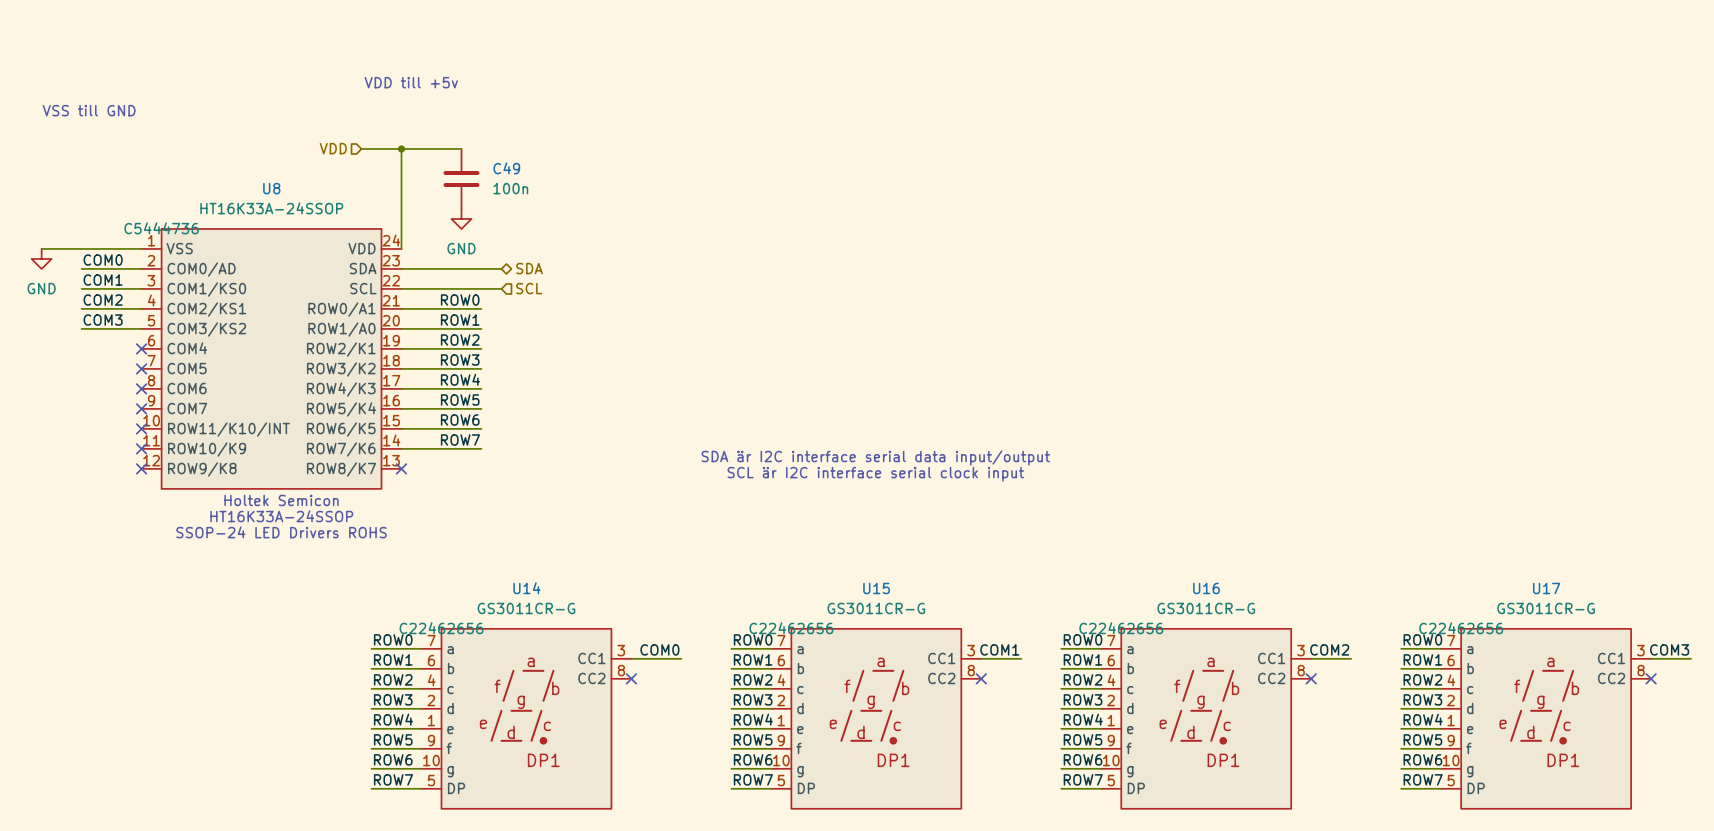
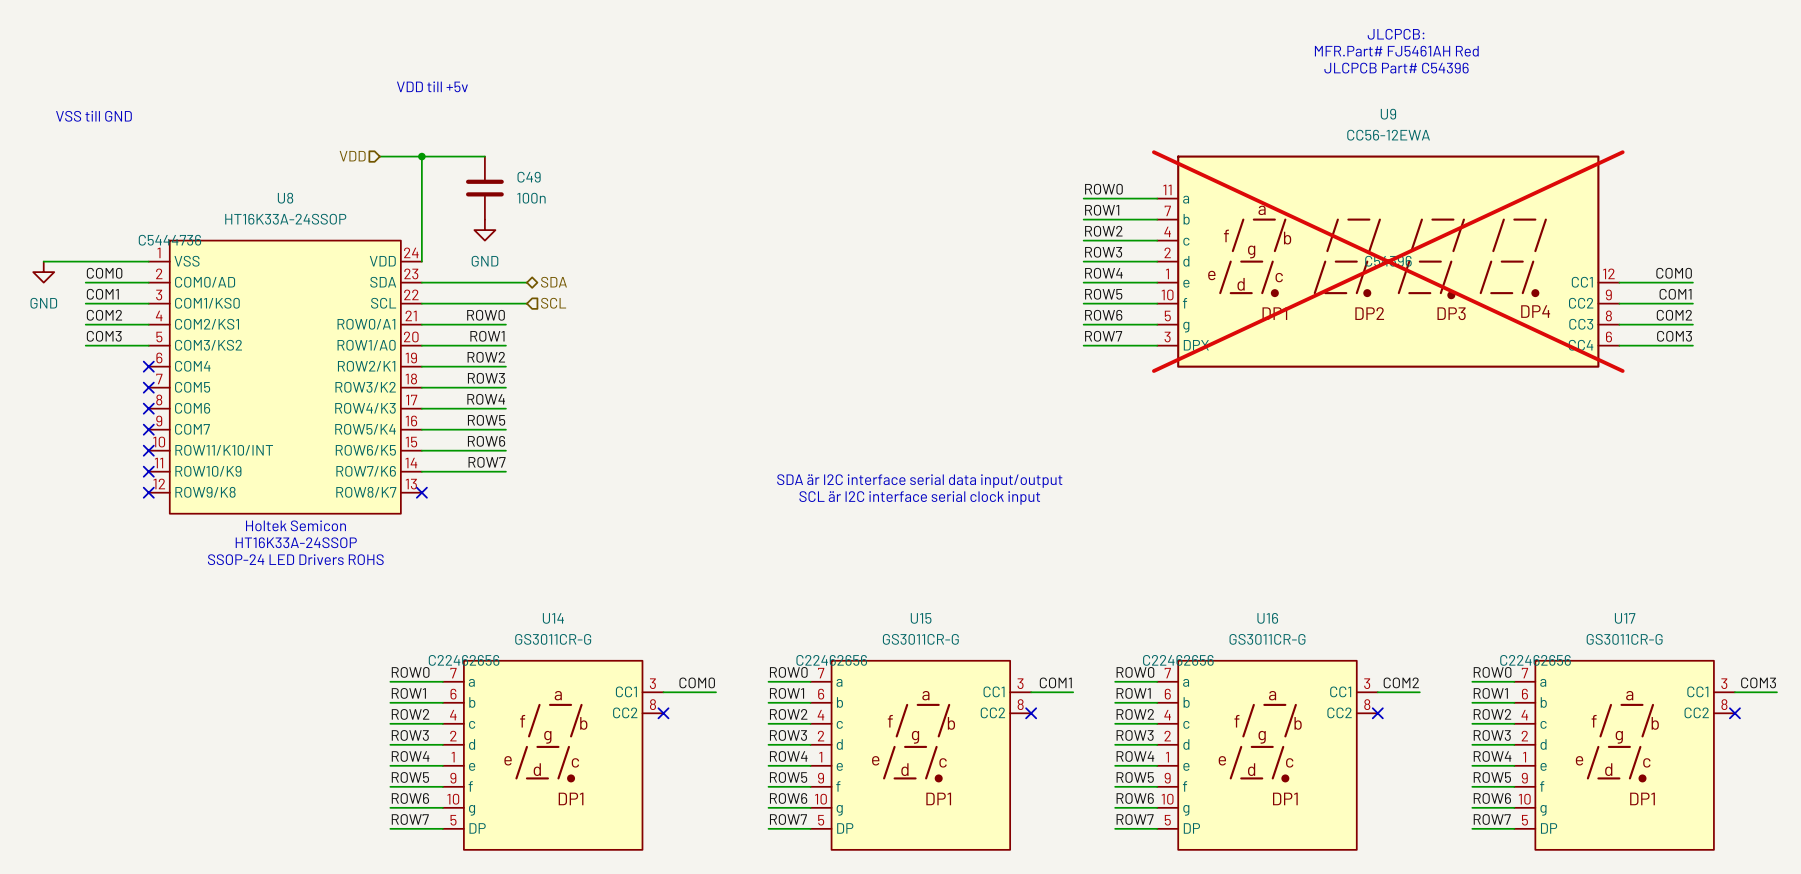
text: none -> JLCPCB: (1396, 34)
text: none -> MFR.Part# FJ5461AH Red (1396, 51)
text: none -> JLCPCB Part# C54396 (1396, 68)
label: none -> ROW0 (1103, 189)
wire: none -> (1083, 198) (1157, 198)
label: none -> ROW1 (1102, 210)
wire: none -> (1083, 219) (1157, 219)
label: none -> ROW2 (1103, 231)
wire: none -> (1083, 240) (1157, 240)
label: none -> ROW3 (1103, 252)
wire: none -> (1083, 261) (1157, 261)
U9: none -> CC56-12EWA (1388, 261)
label: none -> ROW4 (1103, 273)
label: none -> COM0 (1674, 273)
wire: none -> (1083, 282) (1157, 282)
wire: none -> (1619, 282) (1692, 282)
label: none -> ROW5 (1103, 294)
label: none -> COM1 (1675, 294)
wire: none -> (1083, 303) (1157, 303)
wire: none -> (1619, 303) (1692, 303)
label: none -> ROW6 (1103, 315)
label: none -> COM2 (1674, 315)
wire: none -> (1083, 324) (1157, 324)
wire: none -> (1619, 324) (1692, 324)
label: none -> ROW7 (1103, 336)
label: none -> COM3 (1674, 336)
wire: none -> (1083, 345) (1157, 345)
wire: none -> (1619, 345) (1692, 345)

